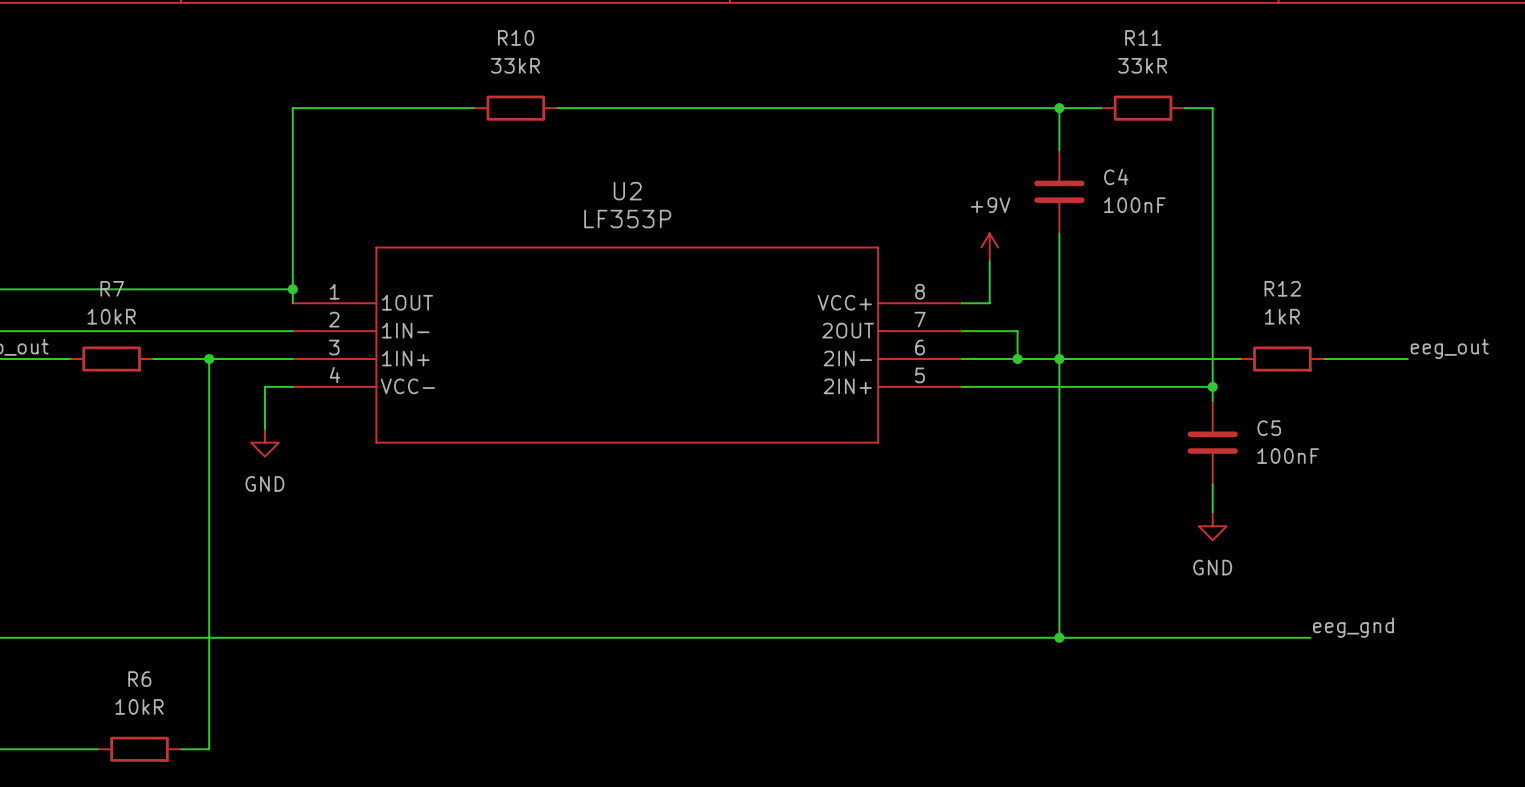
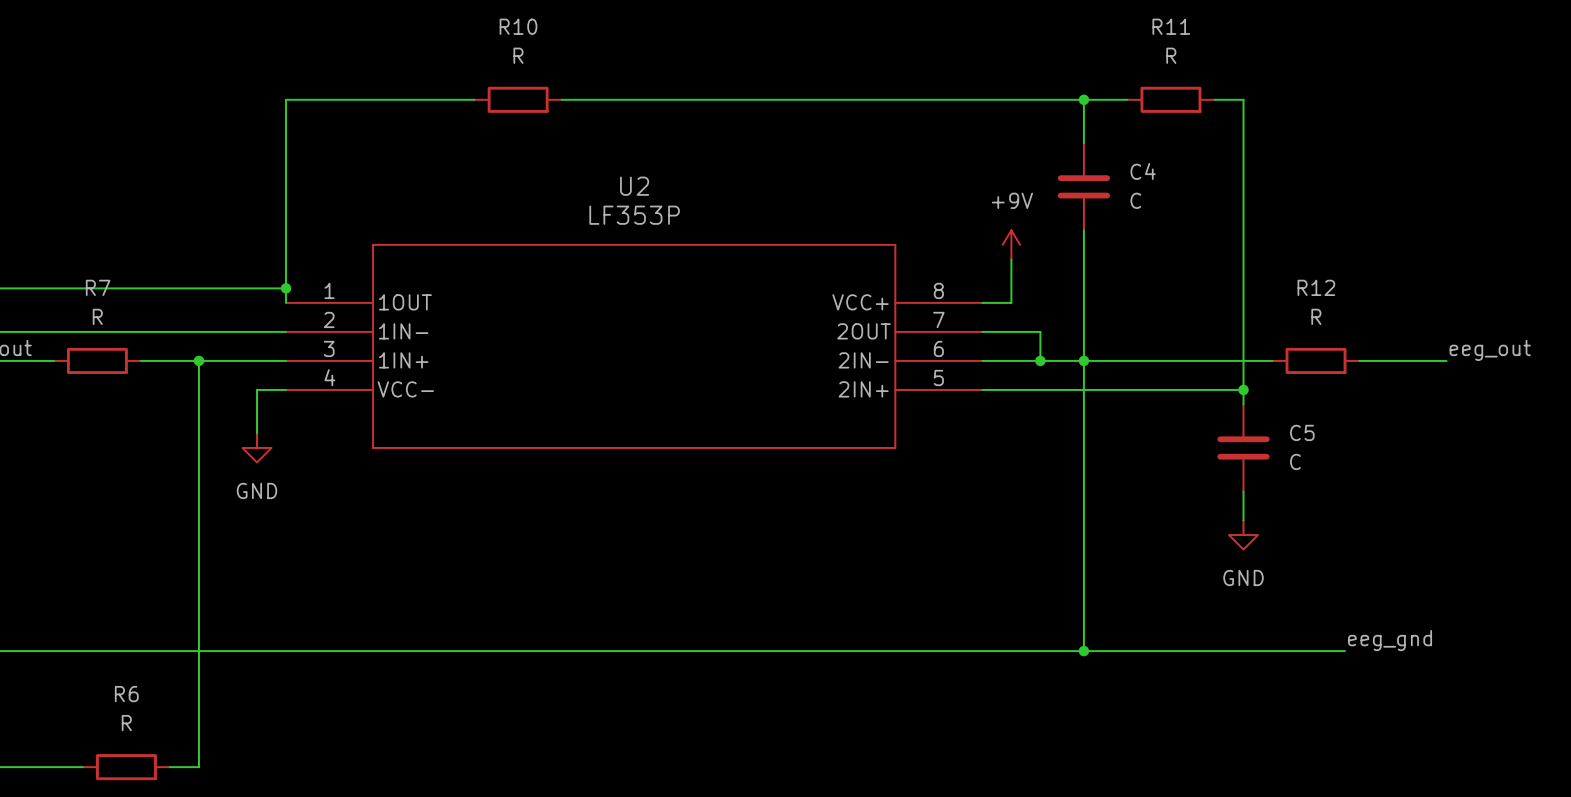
R10 value: 33kR (515, 65) -> R (518, 55)
R11 value: 33kR (1142, 65) -> R (1171, 55)
C4 value: 100nF (1134, 205) -> C (1135, 200)
R7 value: 10kR (111, 316) -> R (97, 316)
R12 value: 1kR (1282, 316) -> R (1316, 316)
C5 value: 100nF (1288, 456) -> C (1295, 461)
R6 value: 10kR (139, 706) -> R (126, 723)

